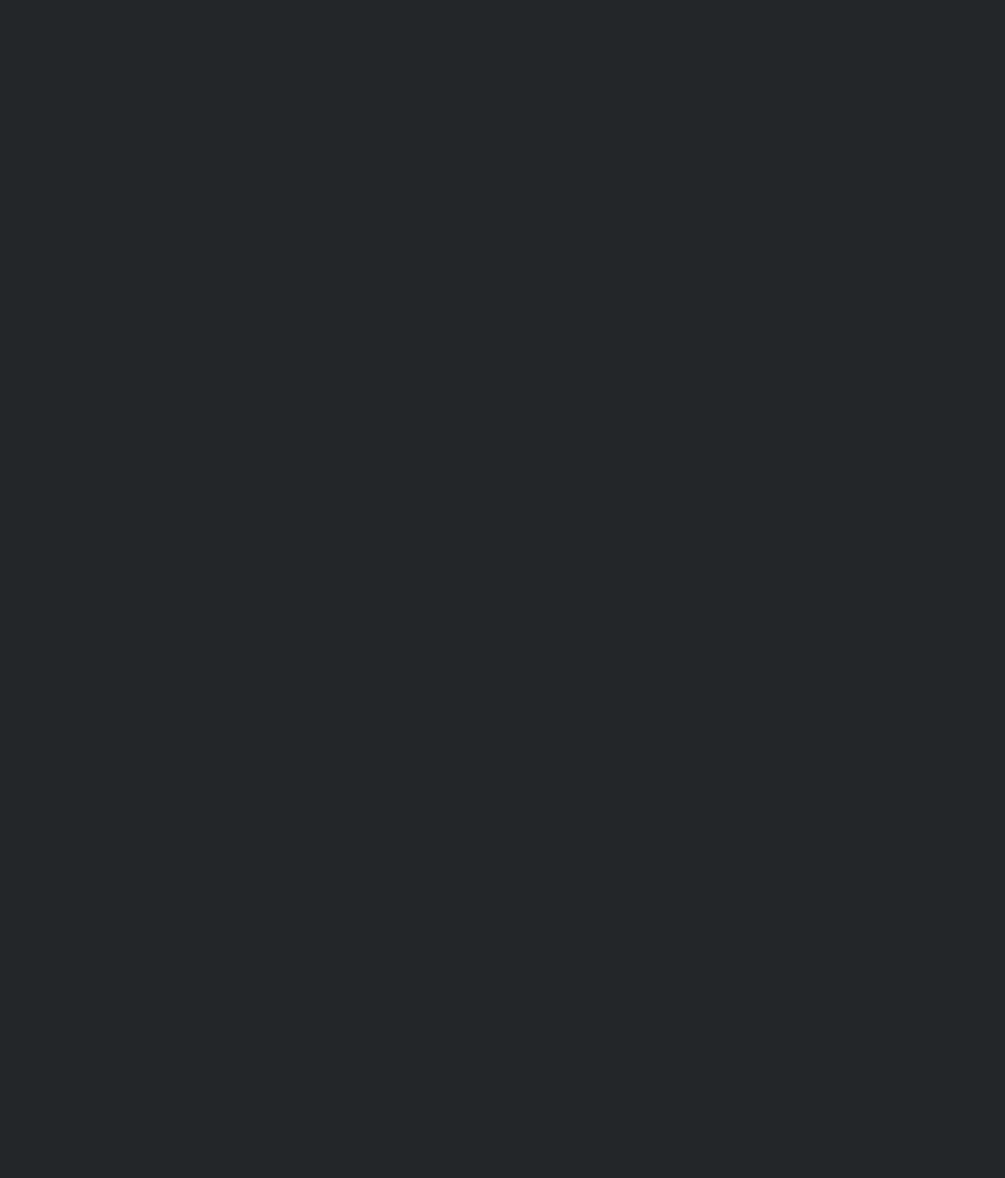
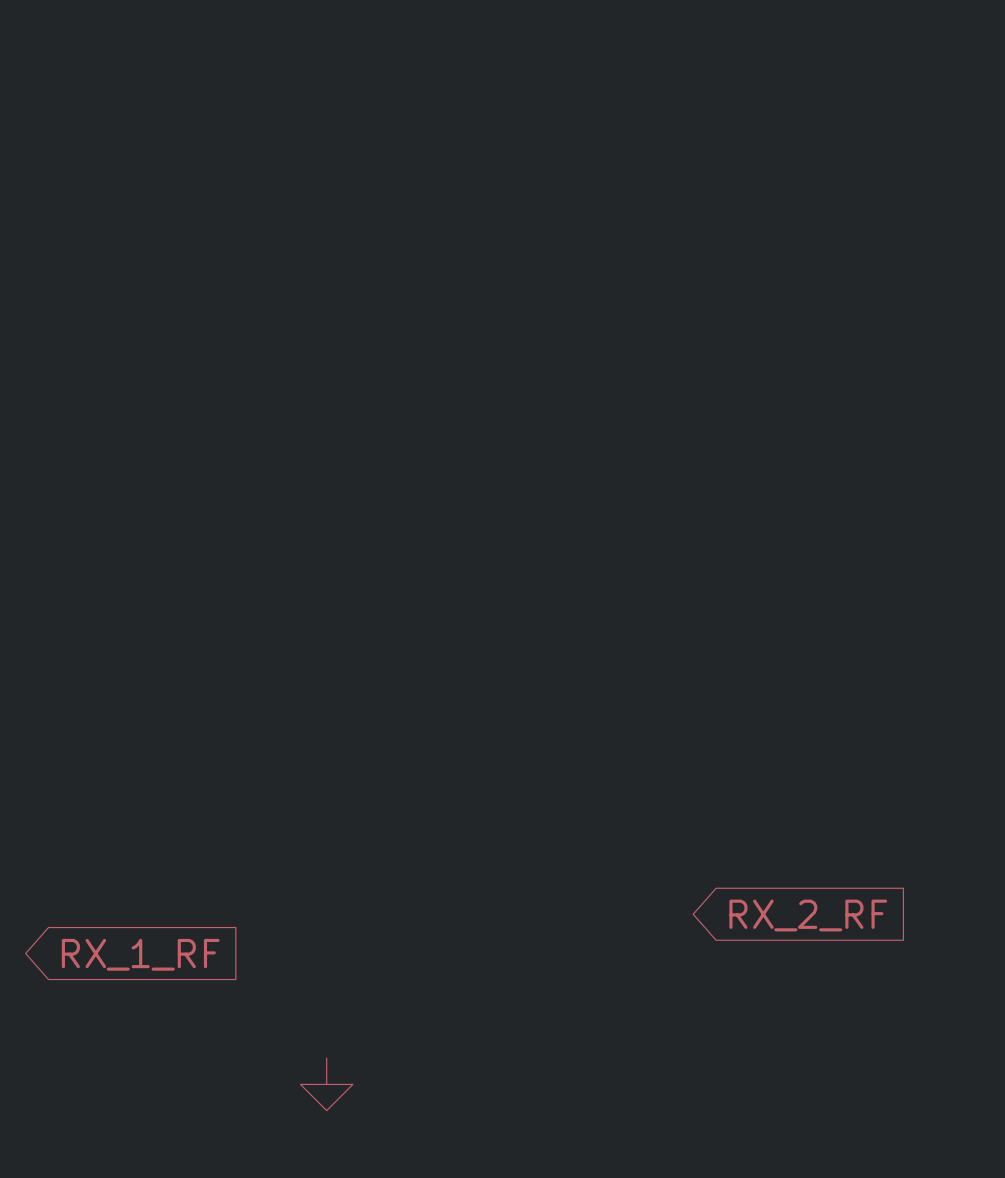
global label: none -> RX_2_RF (808, 915)
global label: none -> RX_1_RF (140, 954)
power symbol: none -> (326, 1084)

